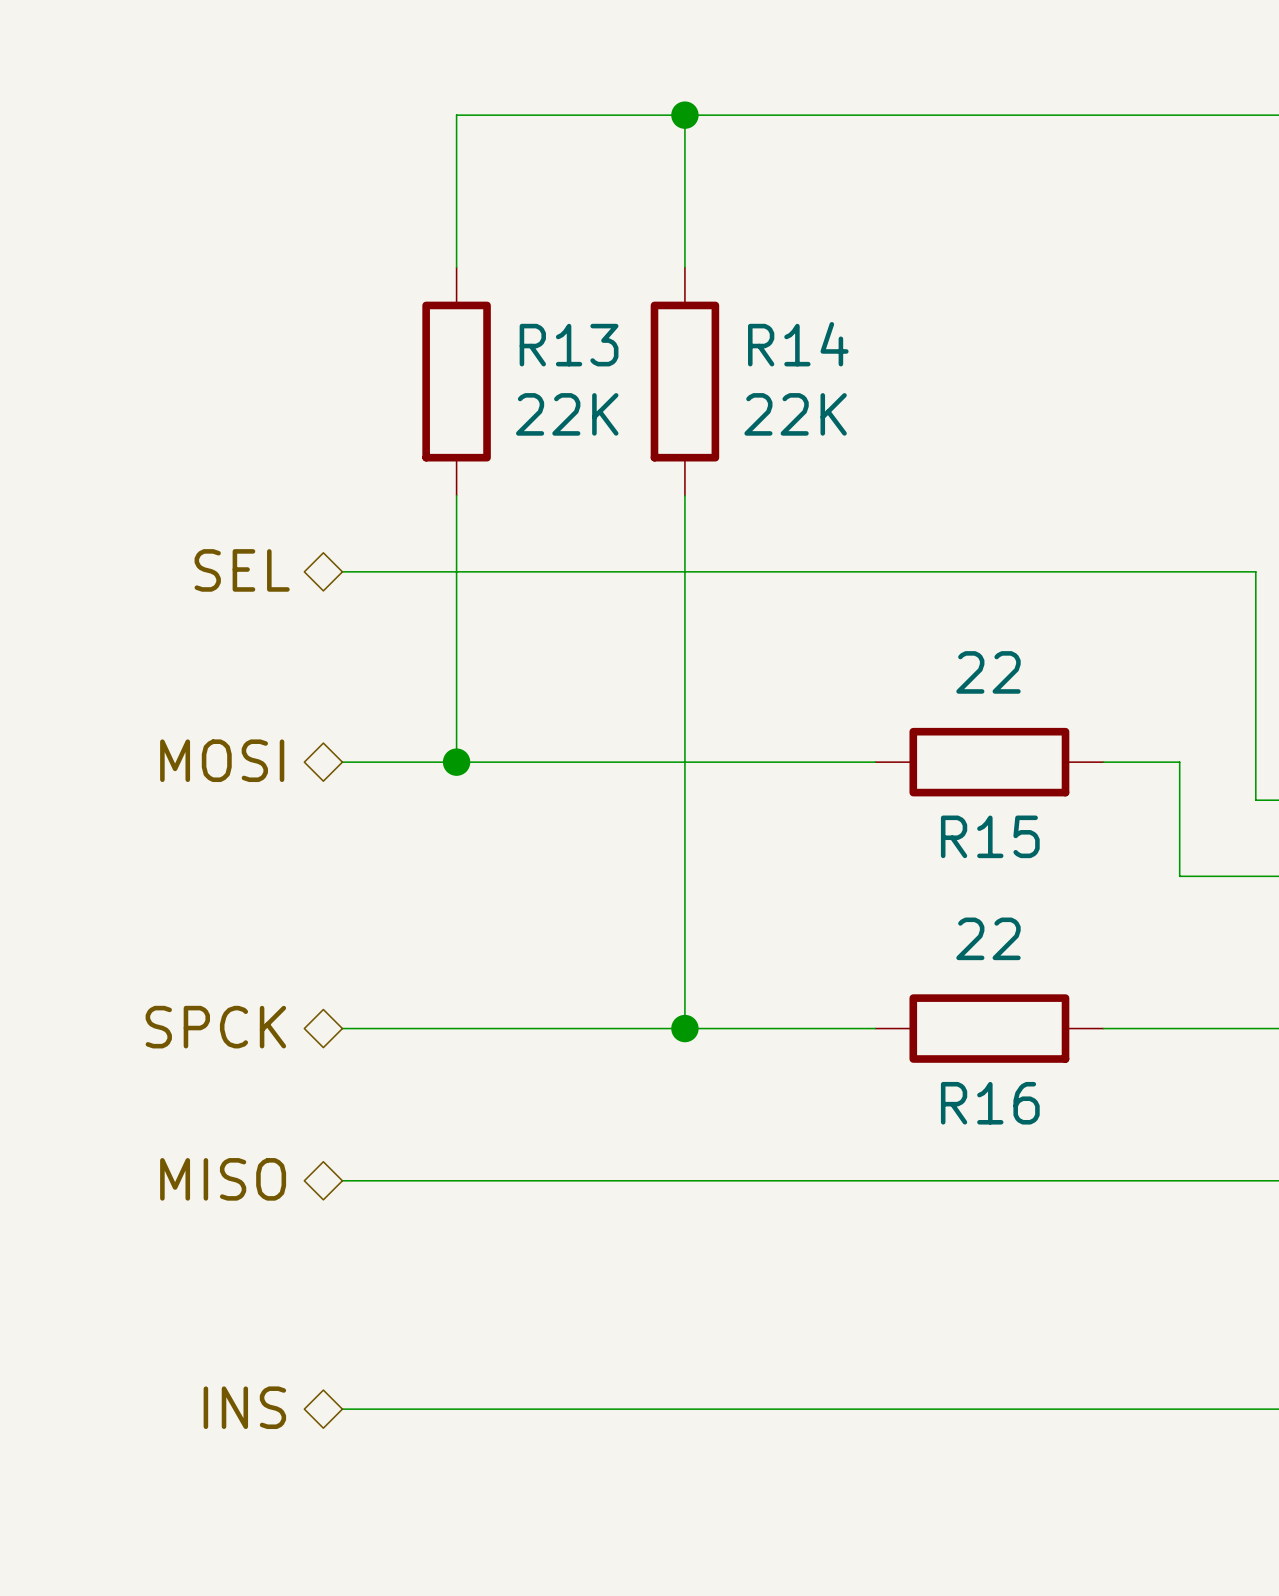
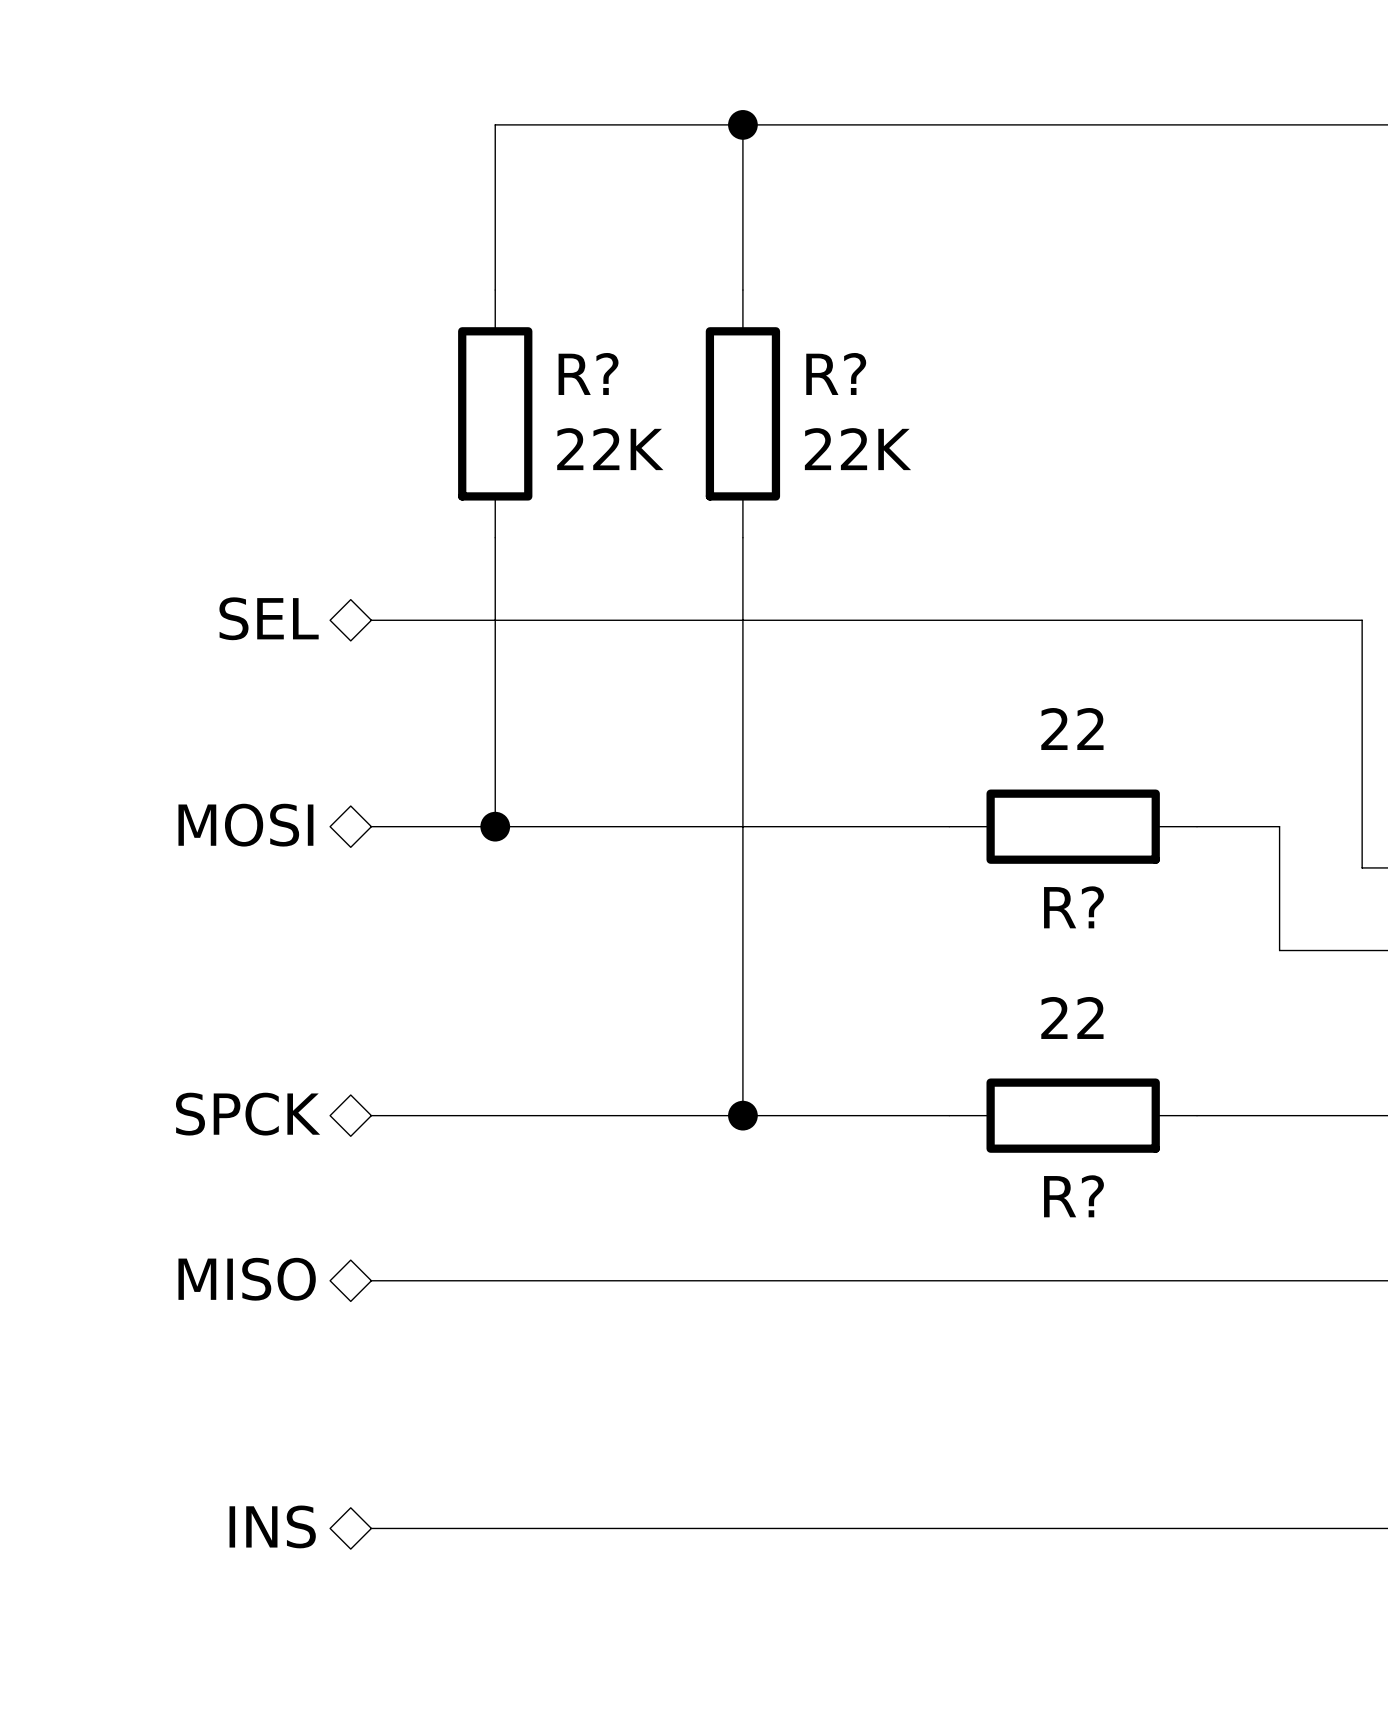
R14 name: R14 (798, 344) -> R? (836, 373)
R13 name: R13 (569, 345) -> R? (588, 373)
R15 name: R15 (990, 836) -> R? (1073, 907)
R16 name: R16 (990, 1103) -> R? (1073, 1196)

